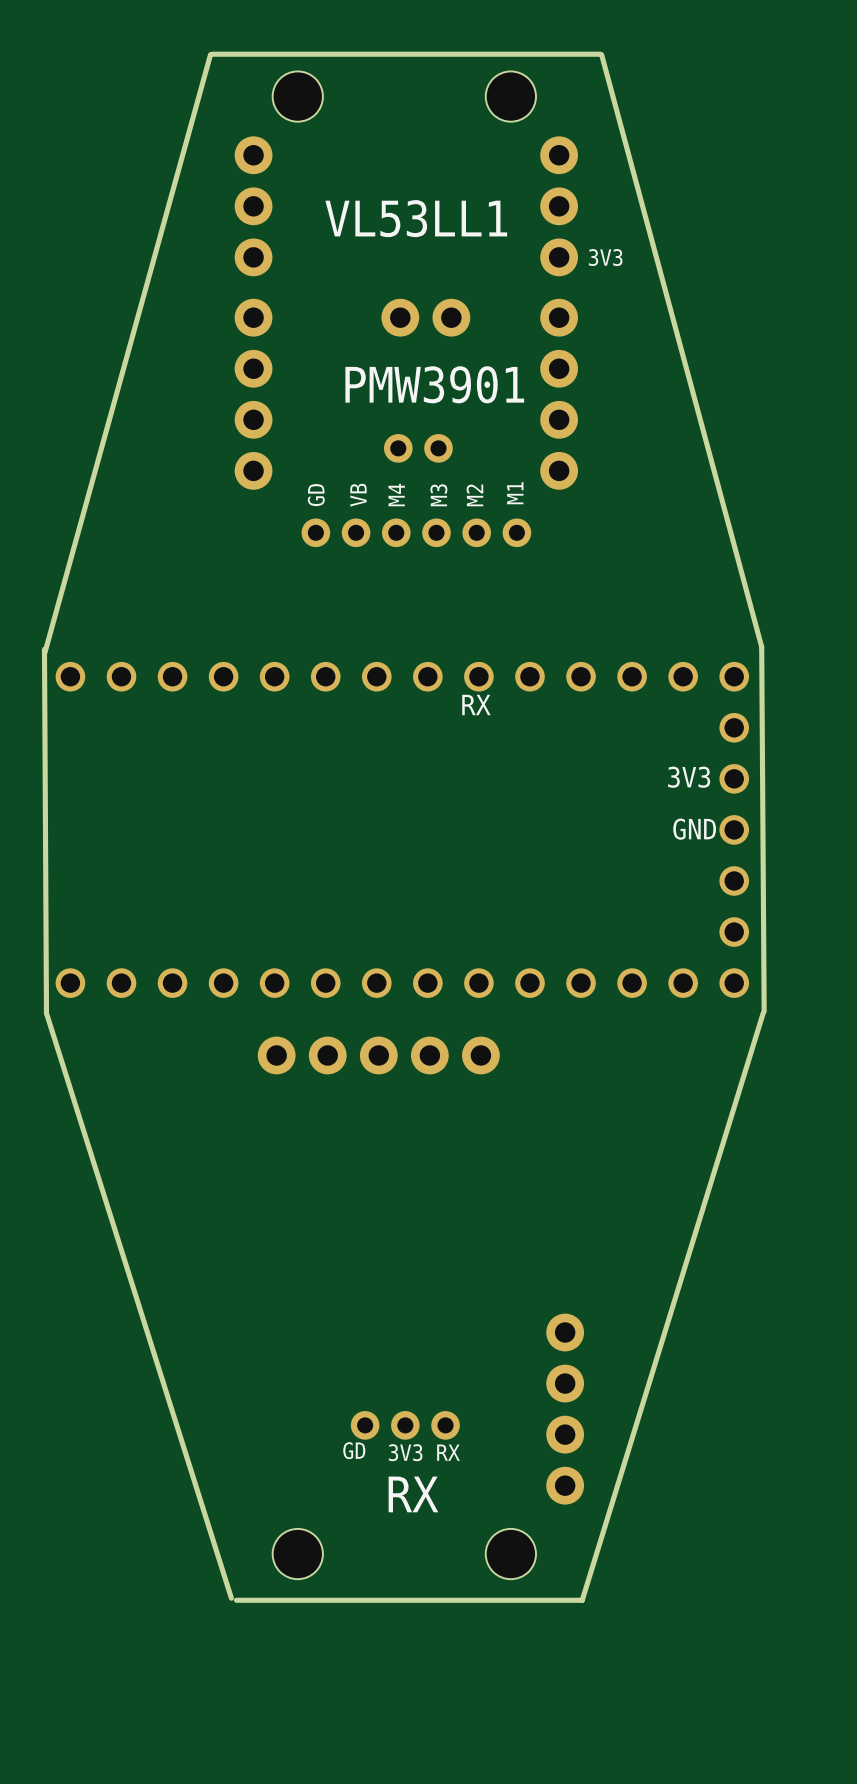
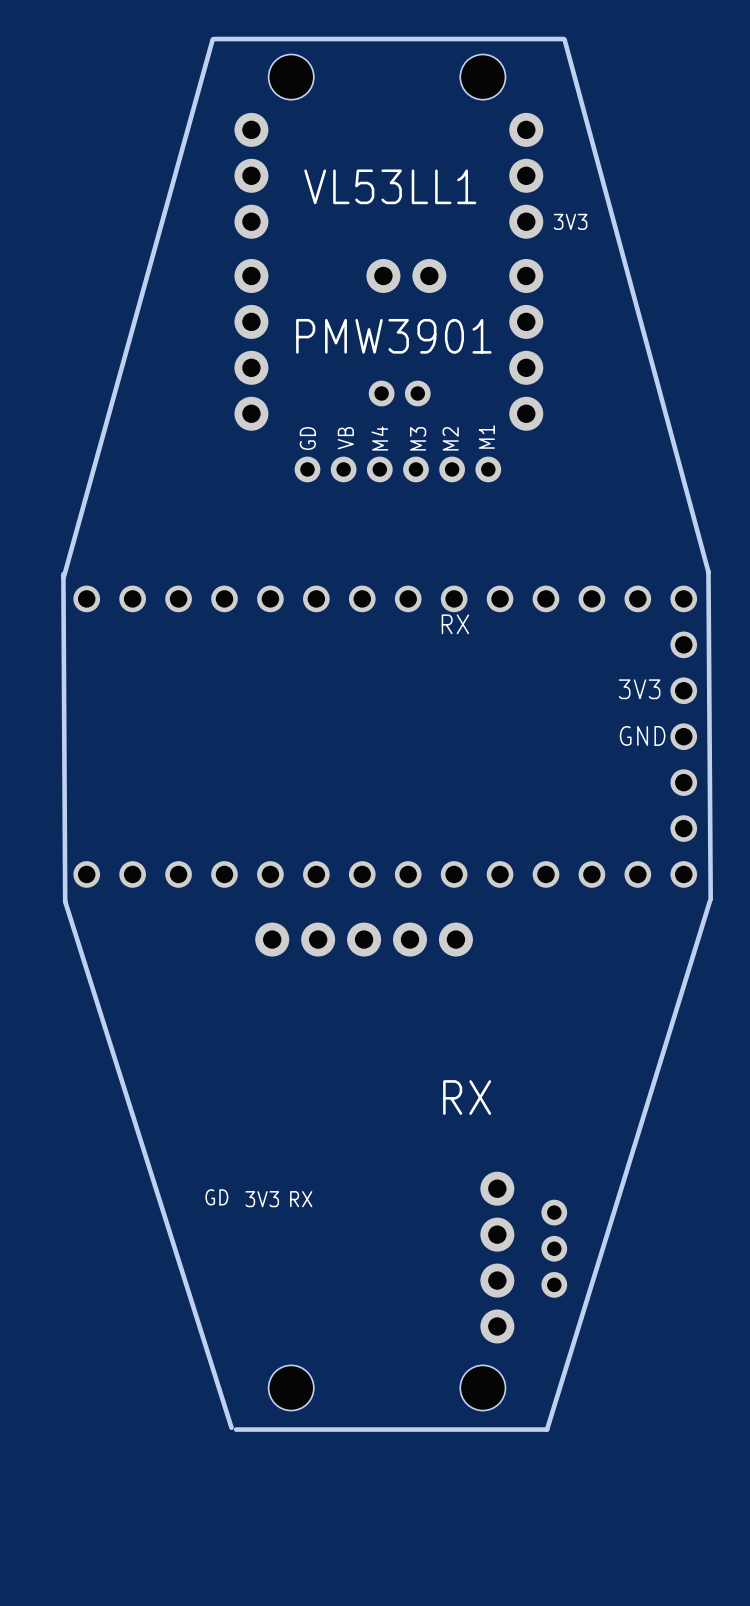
text: none -> RX (467, 1097)
text: none -> RX (301, 1199)
part position: (565, 1409) -> (497, 1257)
part rotation: 0° (405, 1425) -> 90° clockwise (554, 1248)
part position: (405, 1425) -> (554, 1248)
text position: GD (354, 1450) -> GD (216, 1197)
text position: 3V3 (405, 1452) -> 3V3 (262, 1199)
text: RX (448, 1452) -> none
text: RX (413, 1494) -> none

